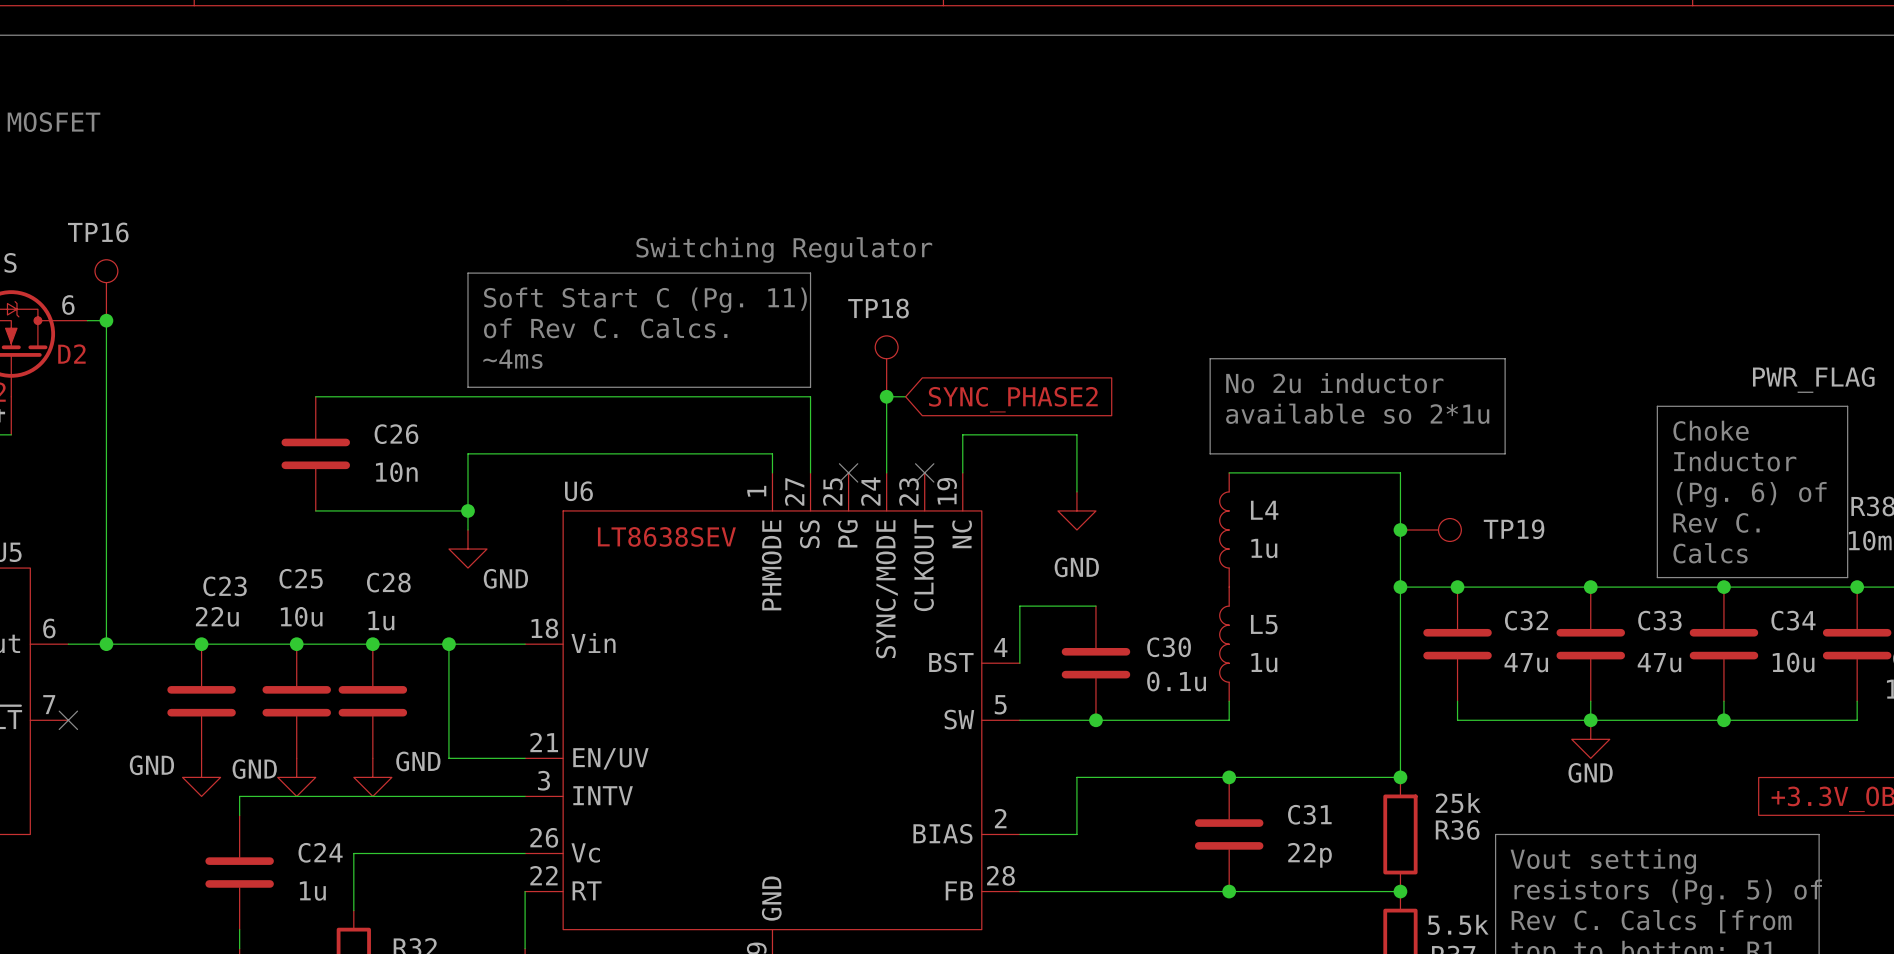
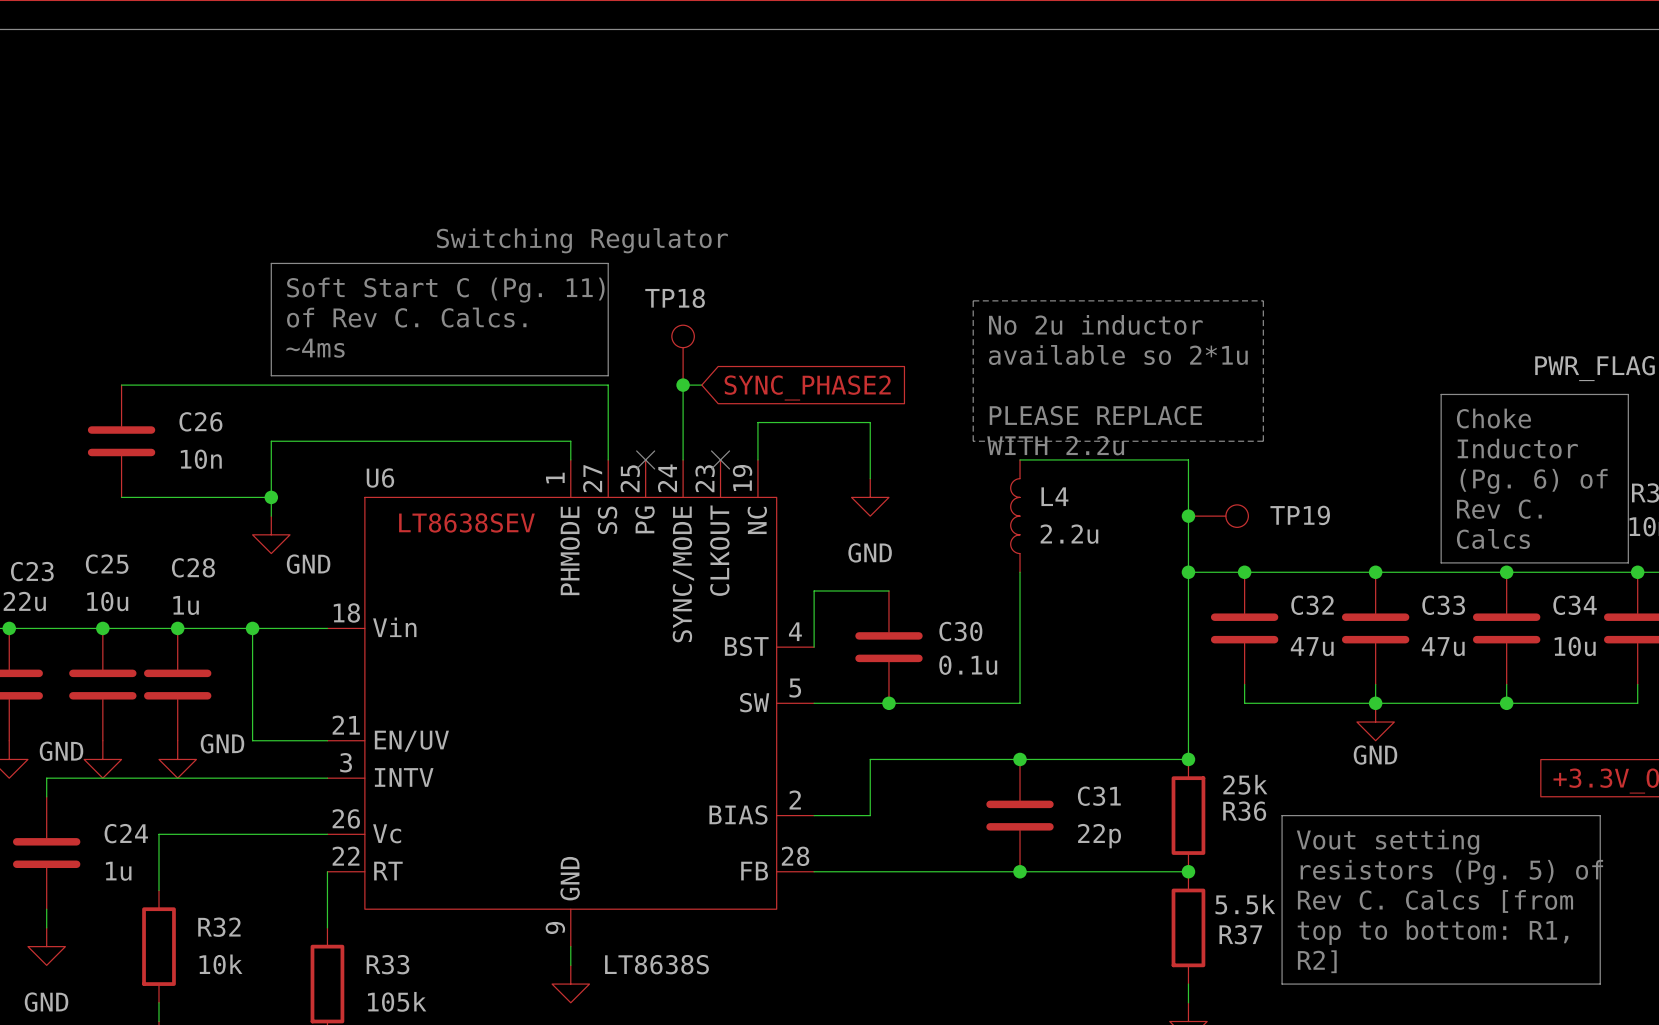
line: (1210, 358) (1505, 358) (1505, 453) (1210, 453) (1210, 358) -> (973, 300) (973, 441) (1263, 441) (1263, 300) (973, 300)
text position: No 2u inductor (1334, 383) -> No 2u inductor (1095, 324)
text position: available so 2*1u (1357, 413) -> available so 2*1u (1118, 355)
text: none -> PLEASE REPLACE (1095, 415)
text: none -> WITH 2.2u (1055, 445)
L4 value: 1u (1264, 548) -> 2.2u (1069, 534)
wire: none -> (1020, 572) (1020, 684)
L5: 1u (1224, 644) -> none

